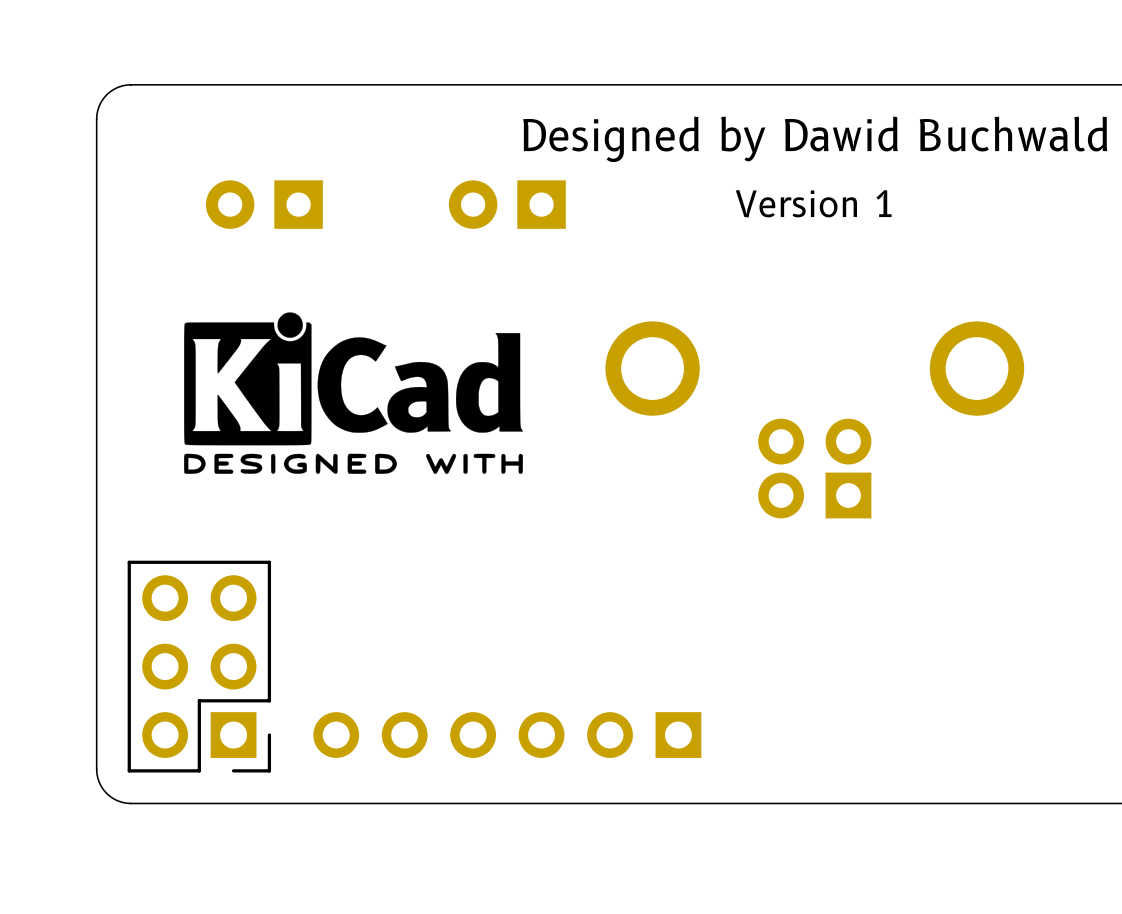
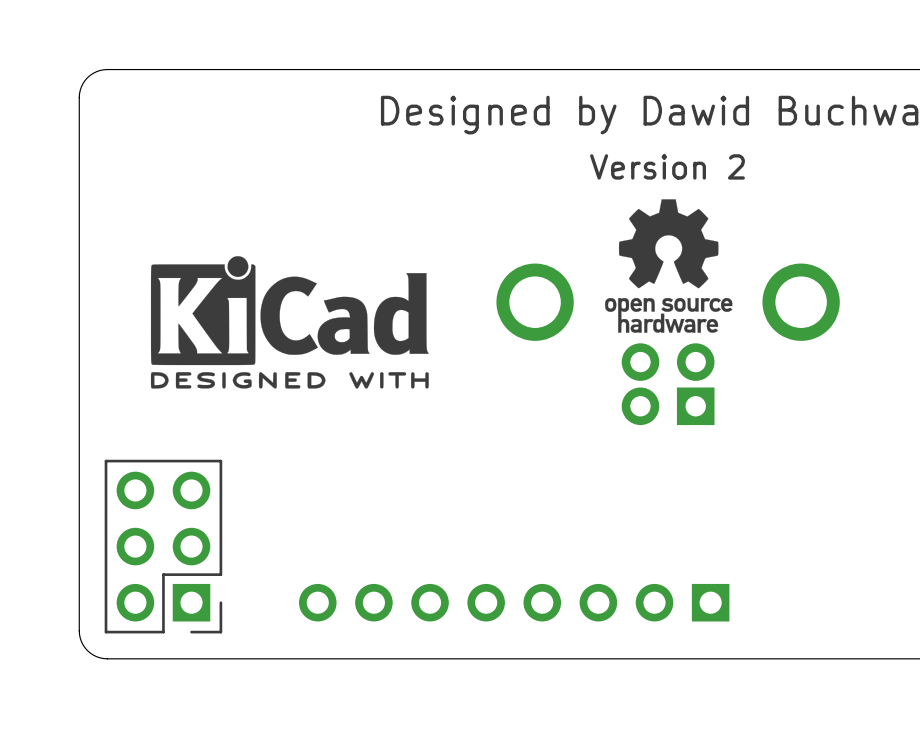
text: Version 1 (813, 203) -> Version 2 (667, 166)
part: (264, 204) -> none
part: (507, 204) -> none
drawing: none -> [605, 199, 733, 333]
part: (507, 735) -> none
part: none -> (514, 602)

